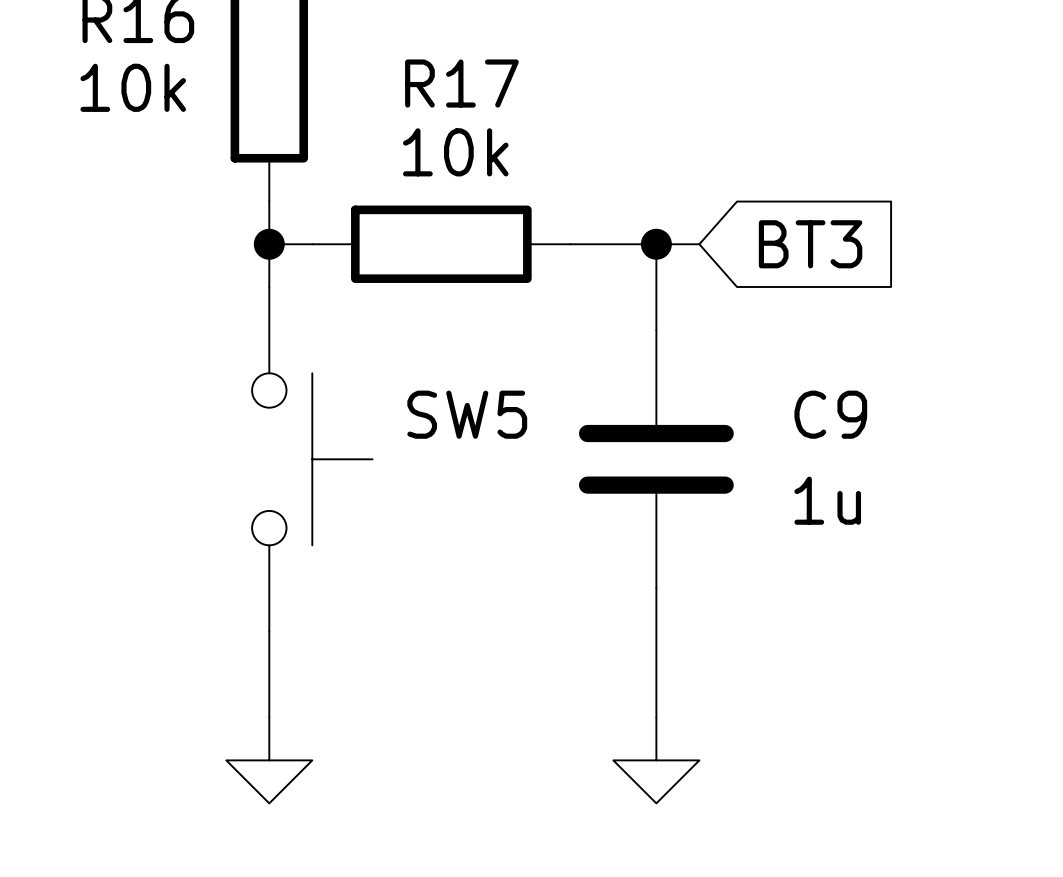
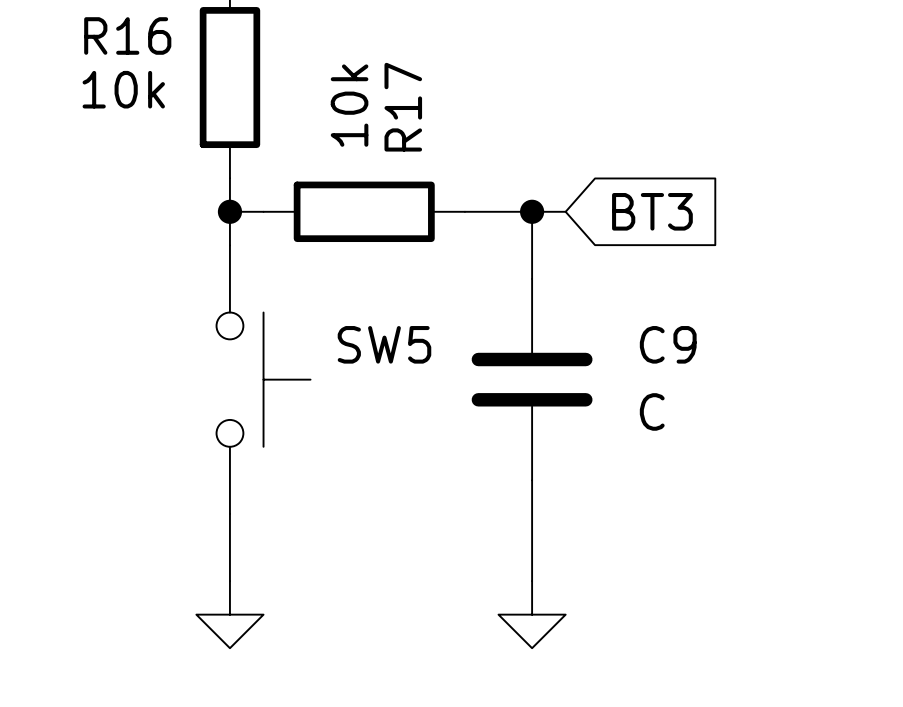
R17 name rotation: 0° (461, 83) -> 90° counterclockwise (403, 107)
R17 value rotation: 0° (455, 152) -> 90° counterclockwise (349, 105)
C9 value: 1u (827, 500) -> C (652, 411)

